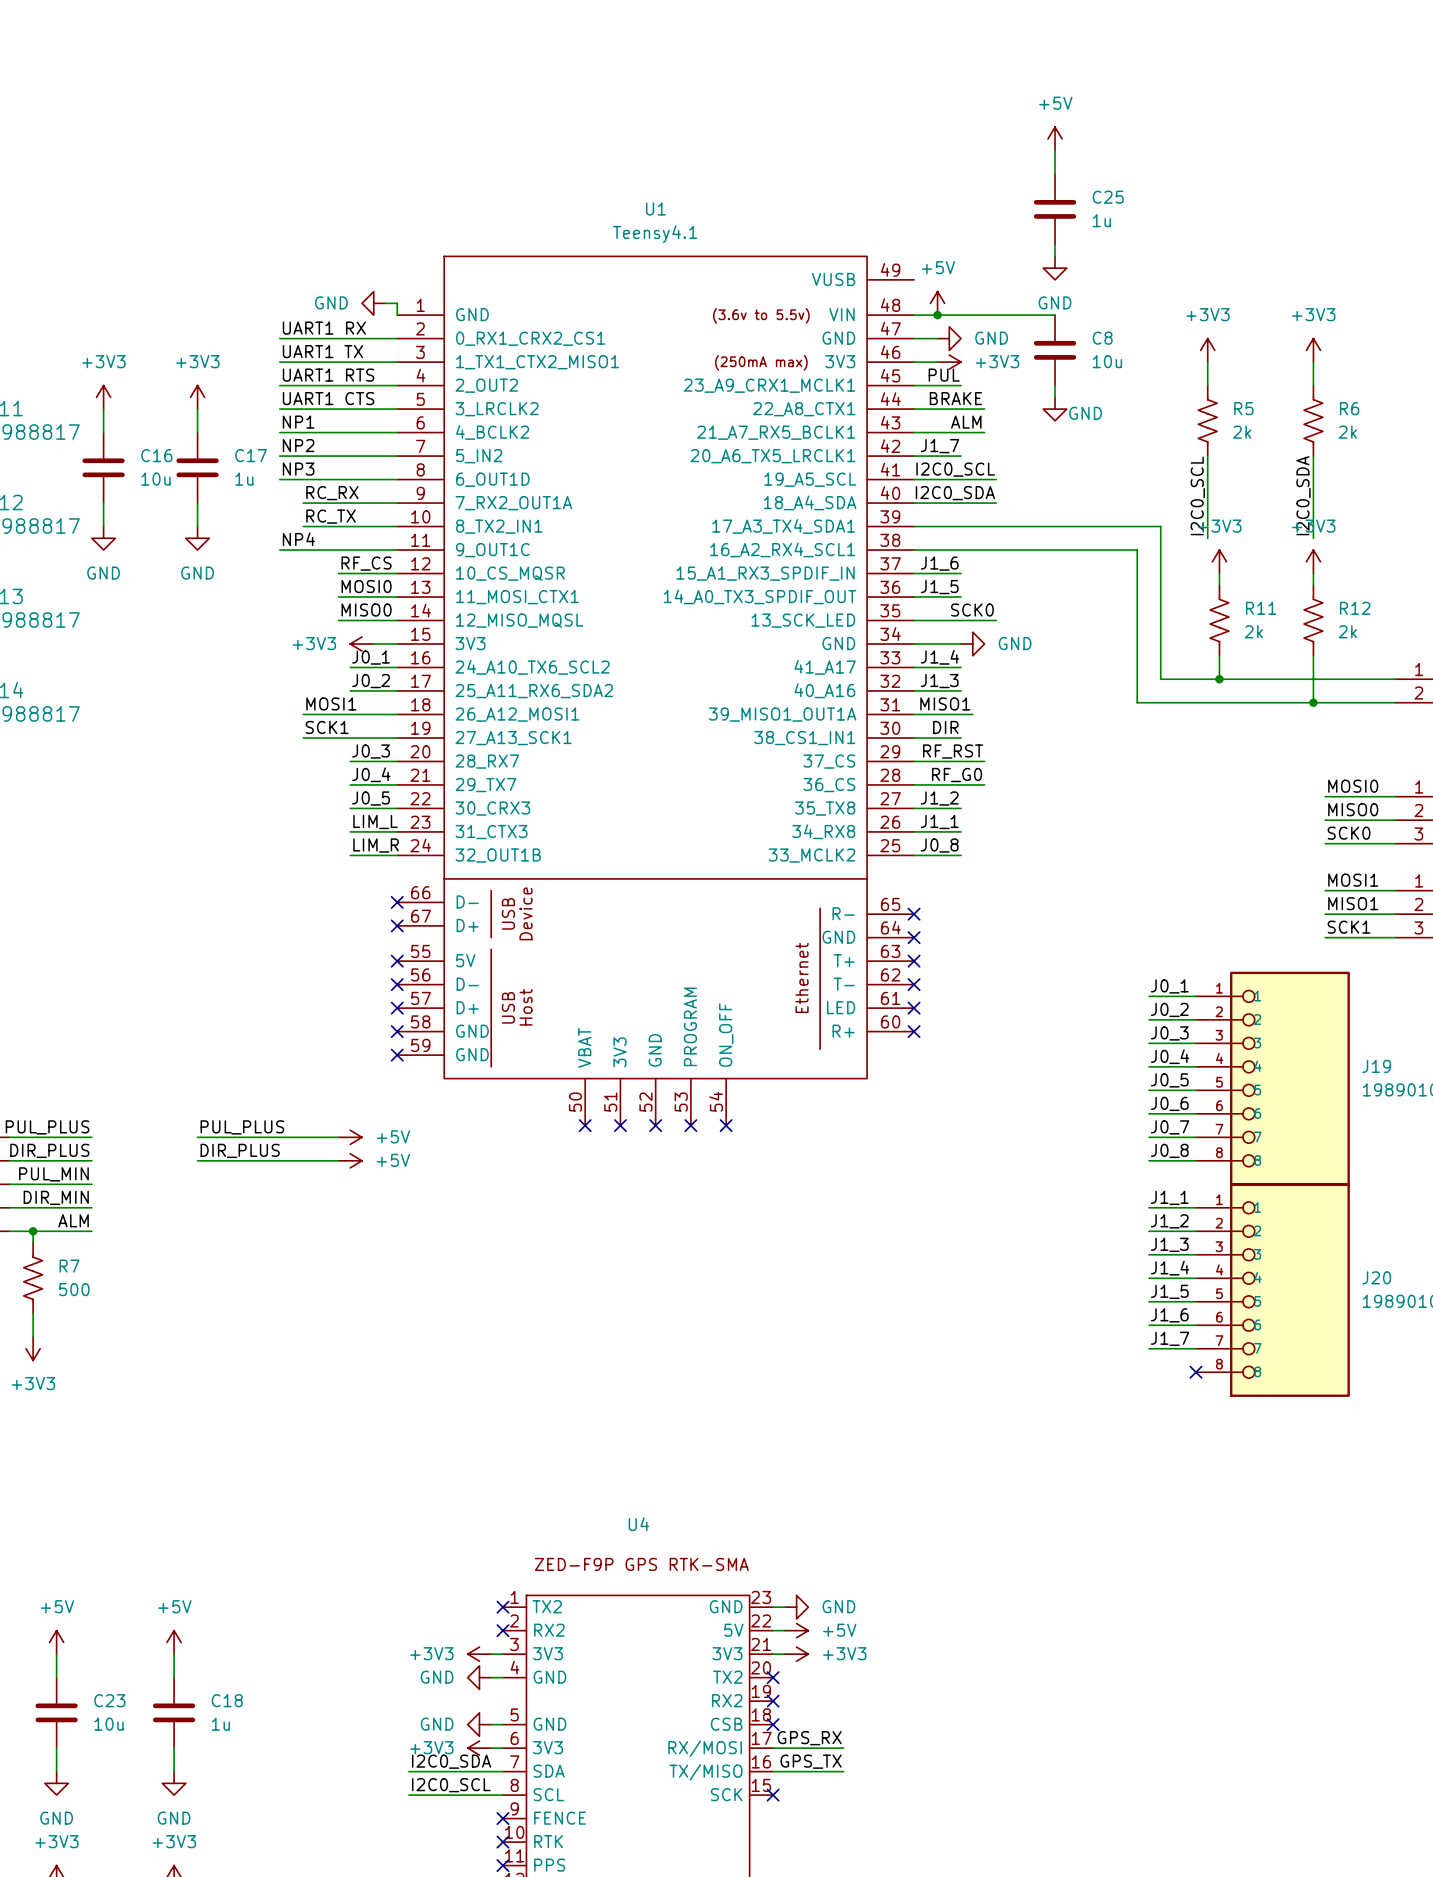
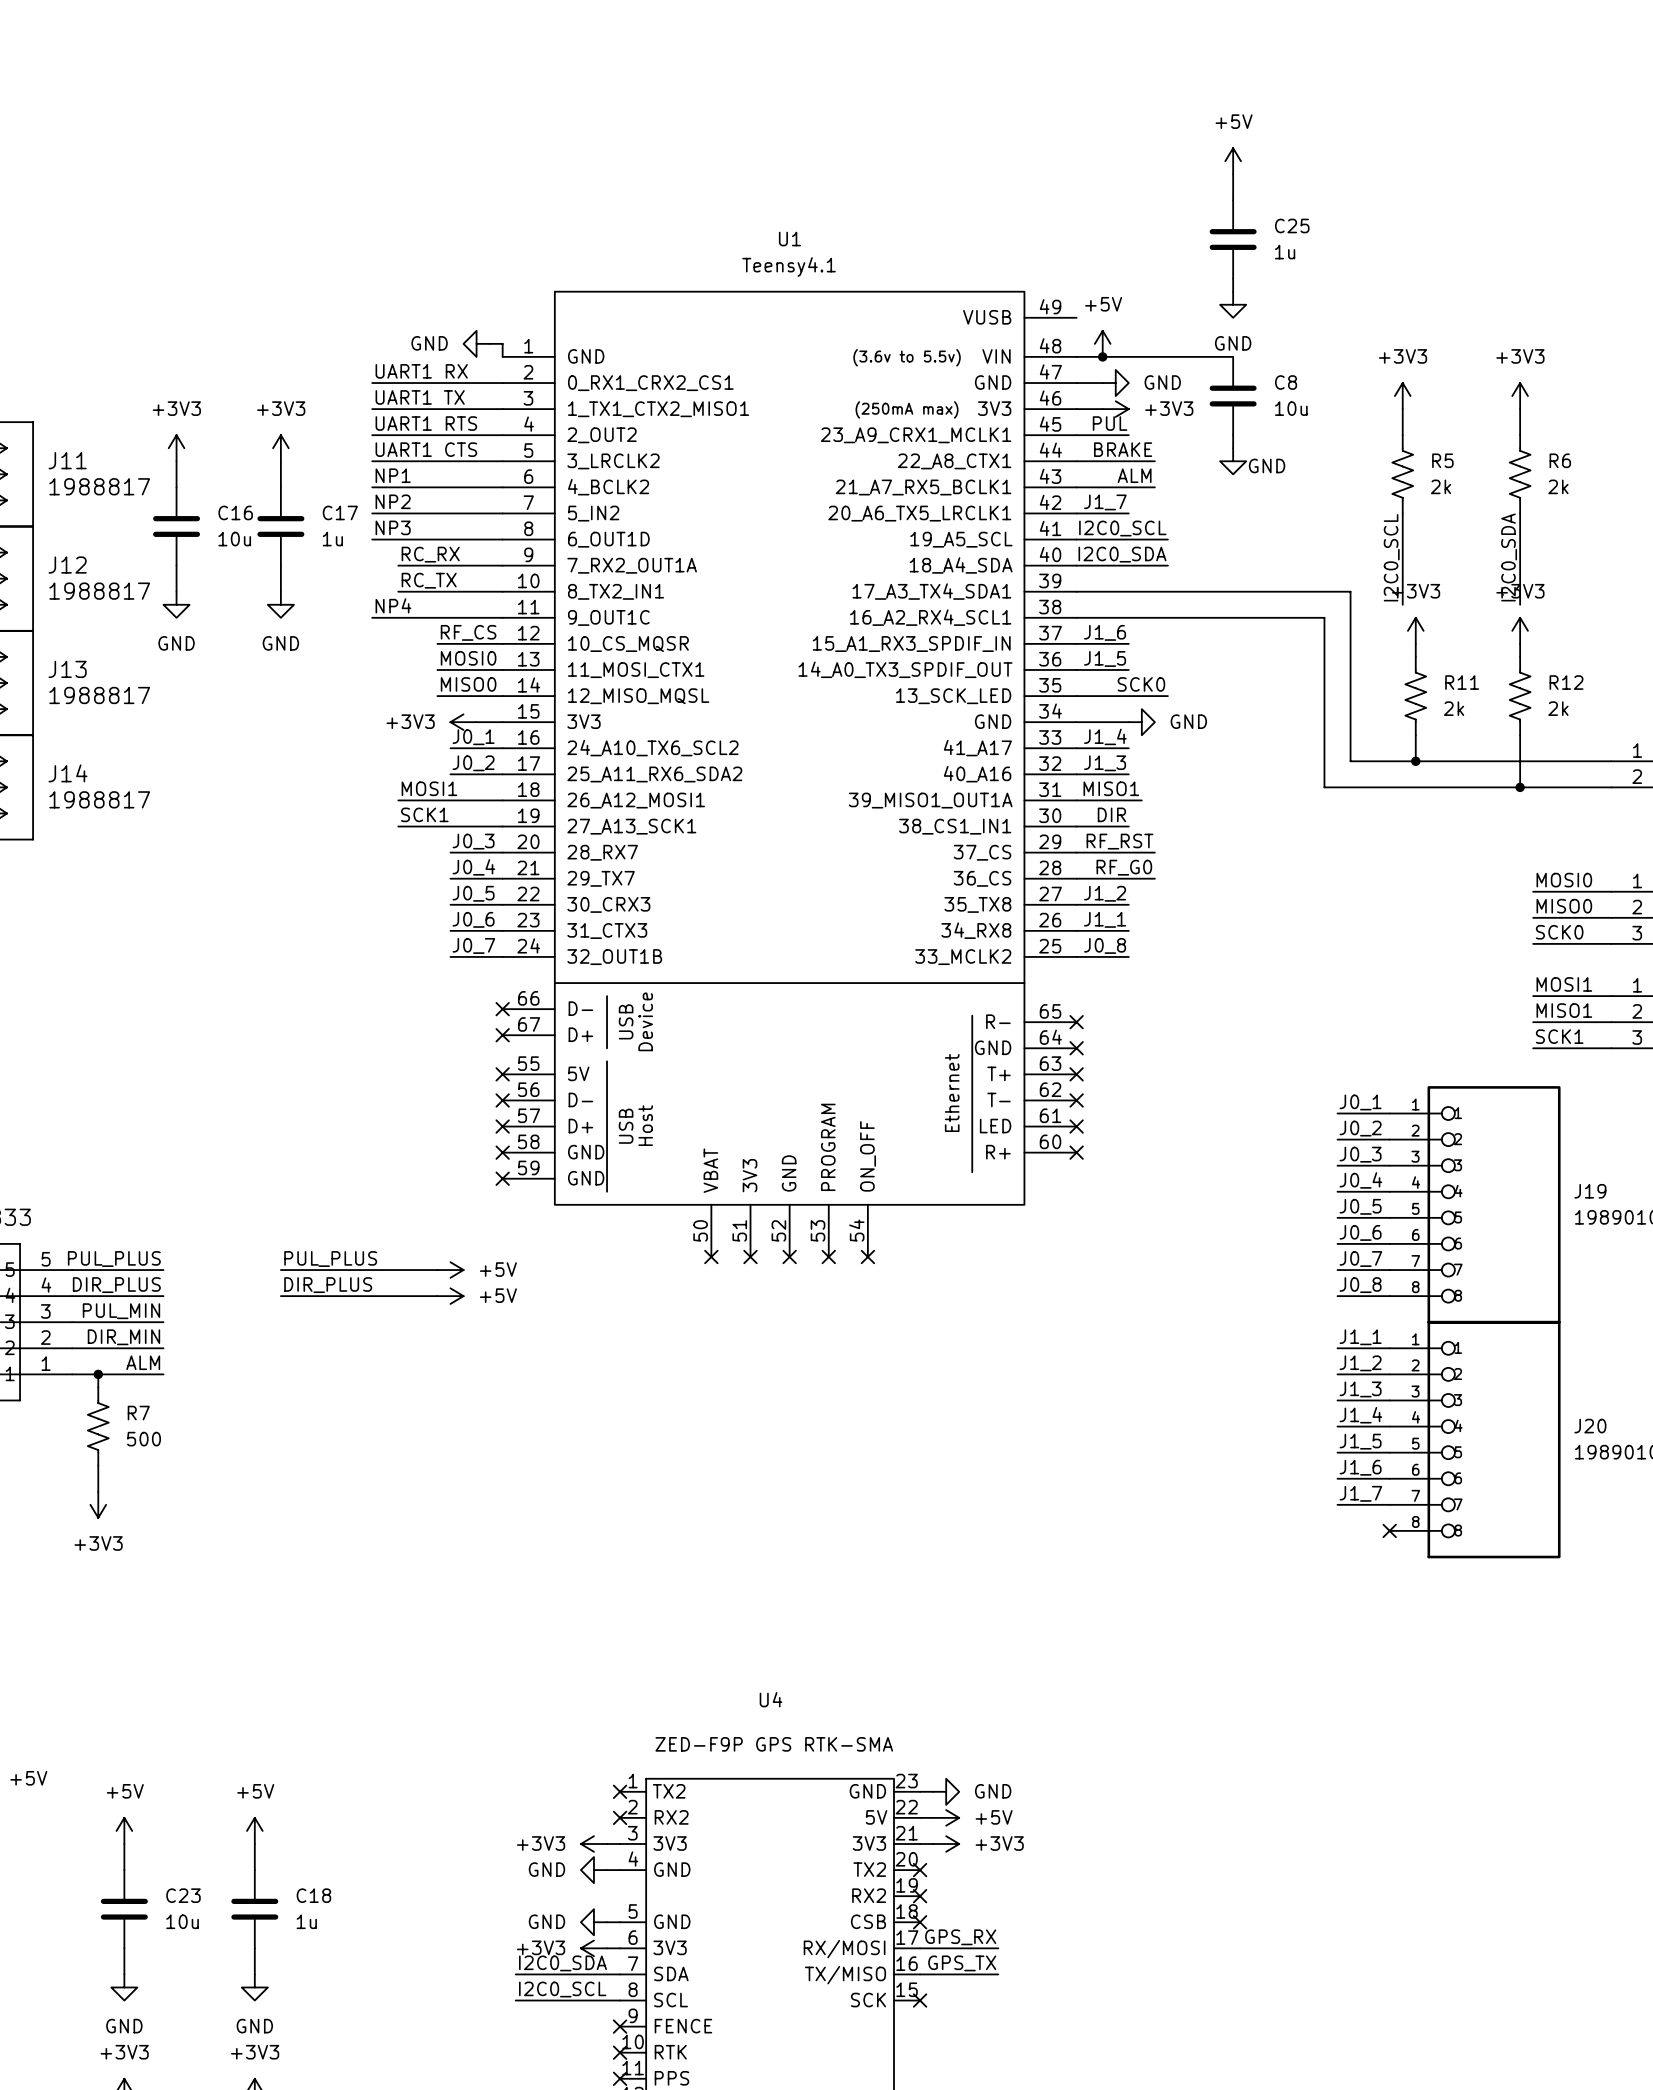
label: LIM_L (375, 822) -> J0_6 (473, 919)
label: LIM_R (376, 845) -> J0_7 (473, 945)

